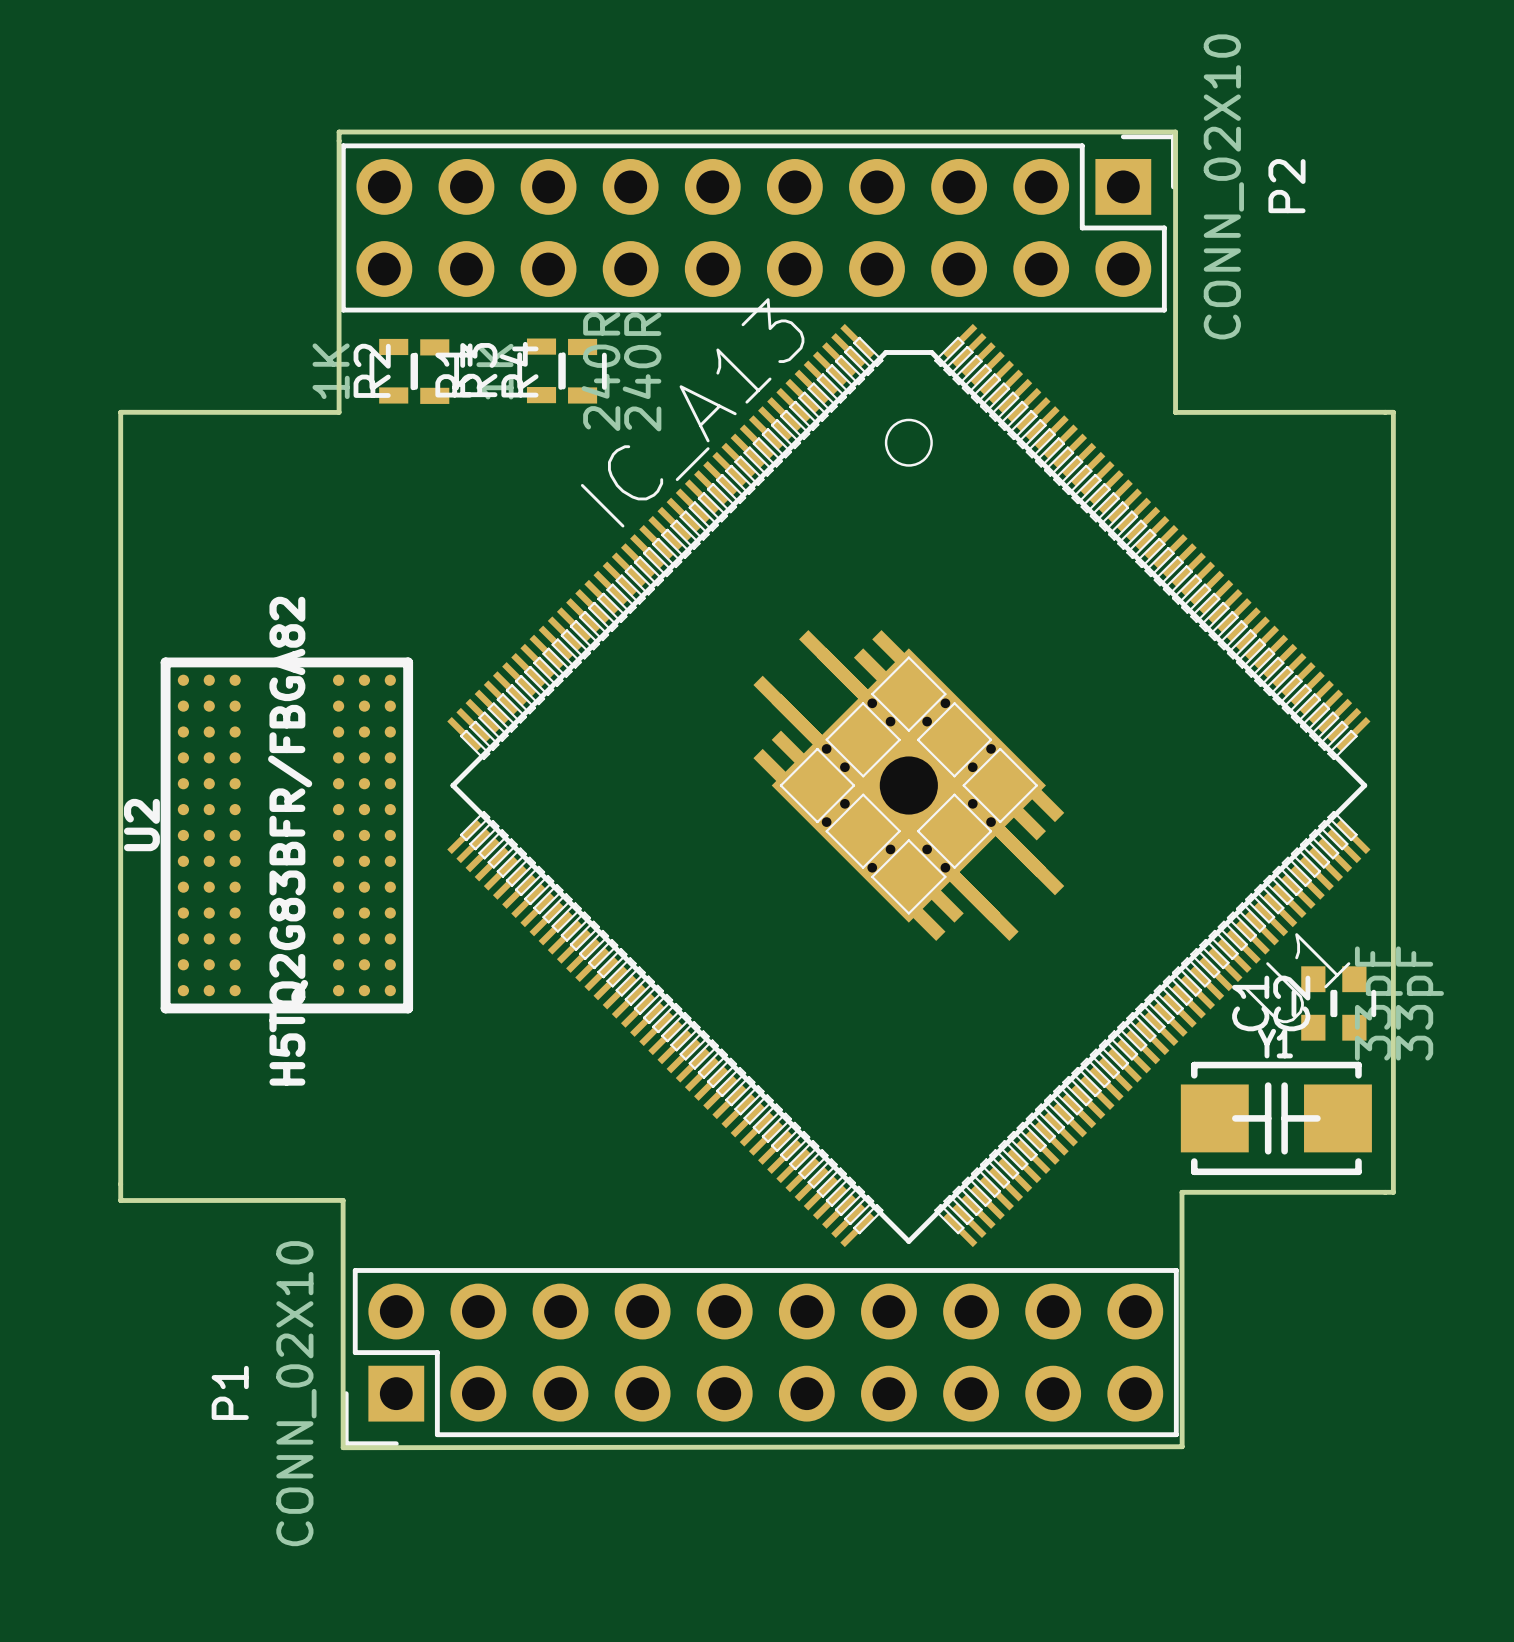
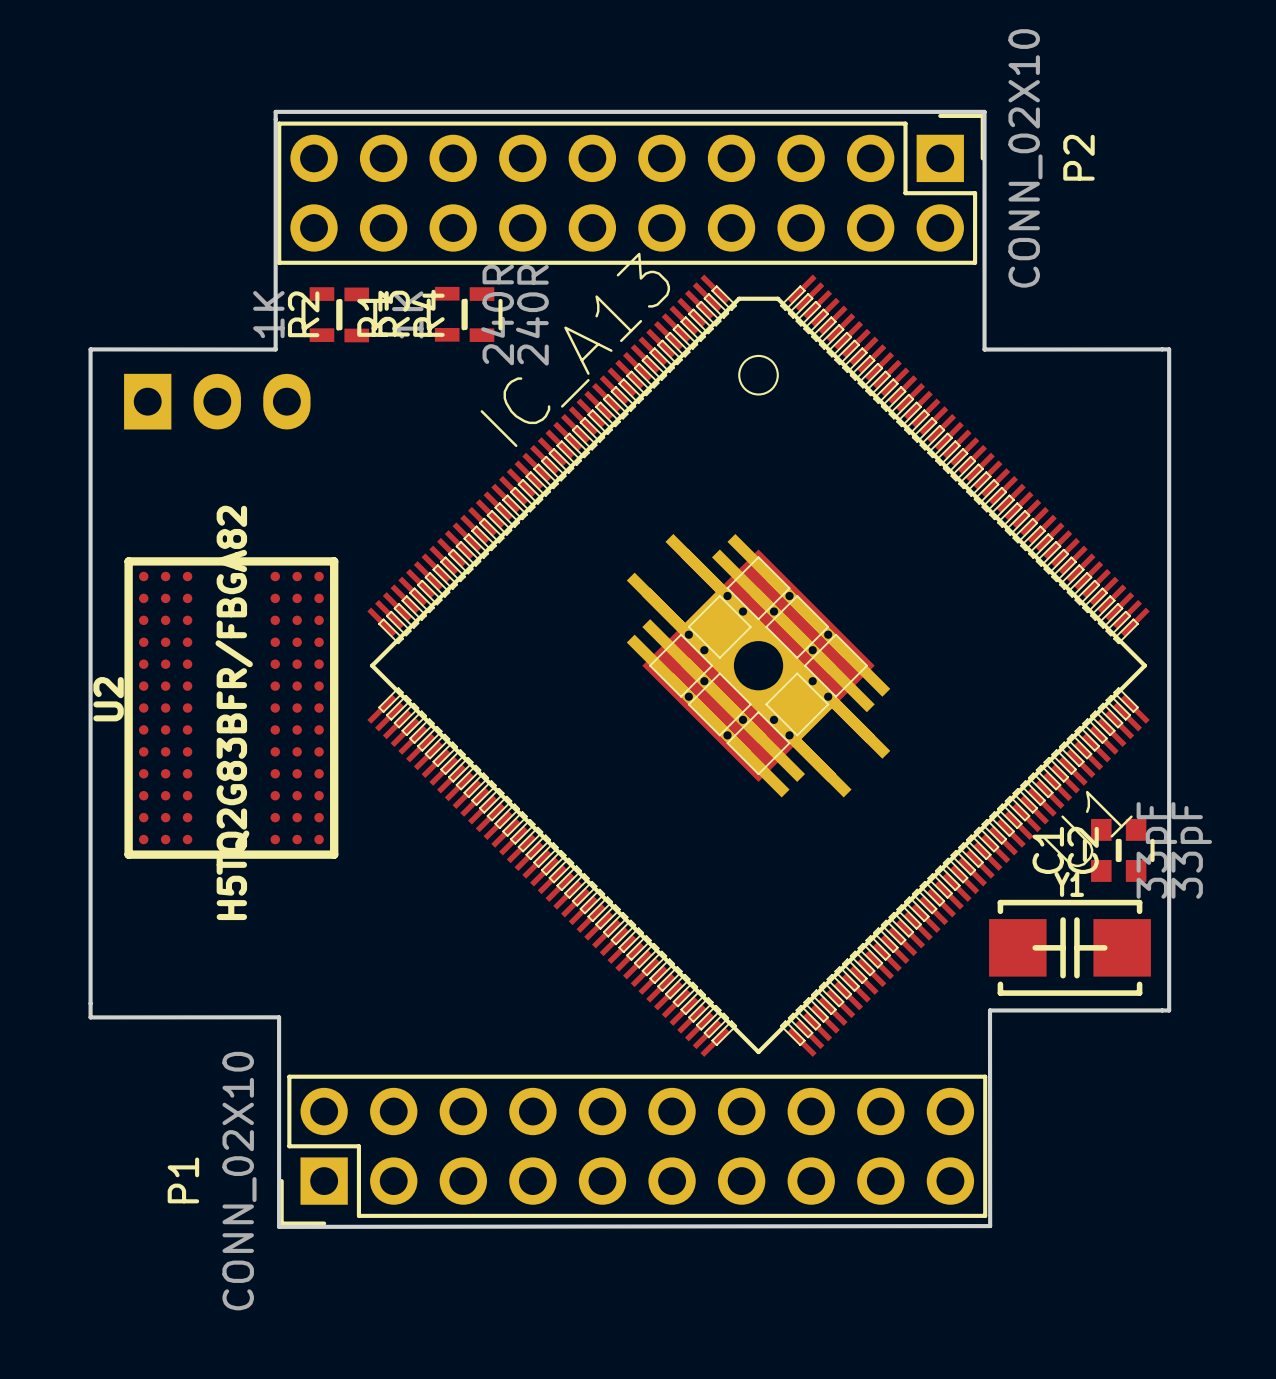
part: none -> (217, 401)

